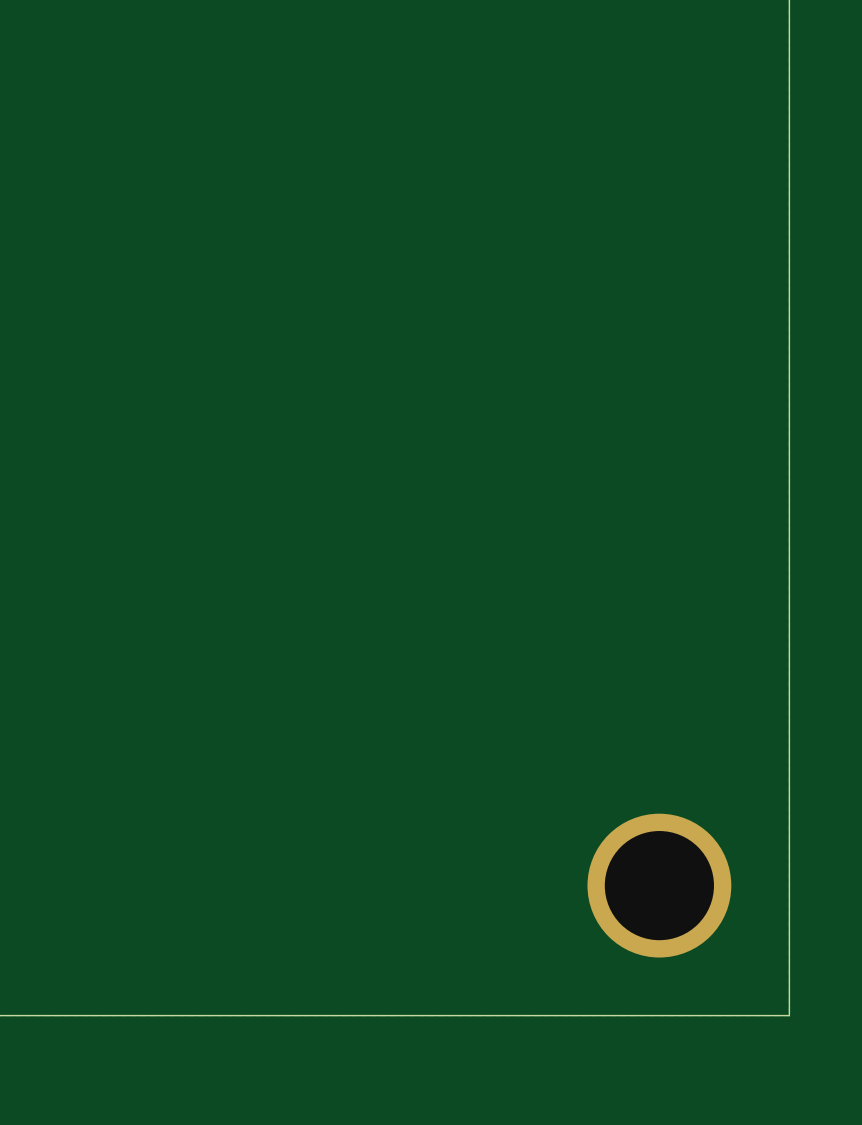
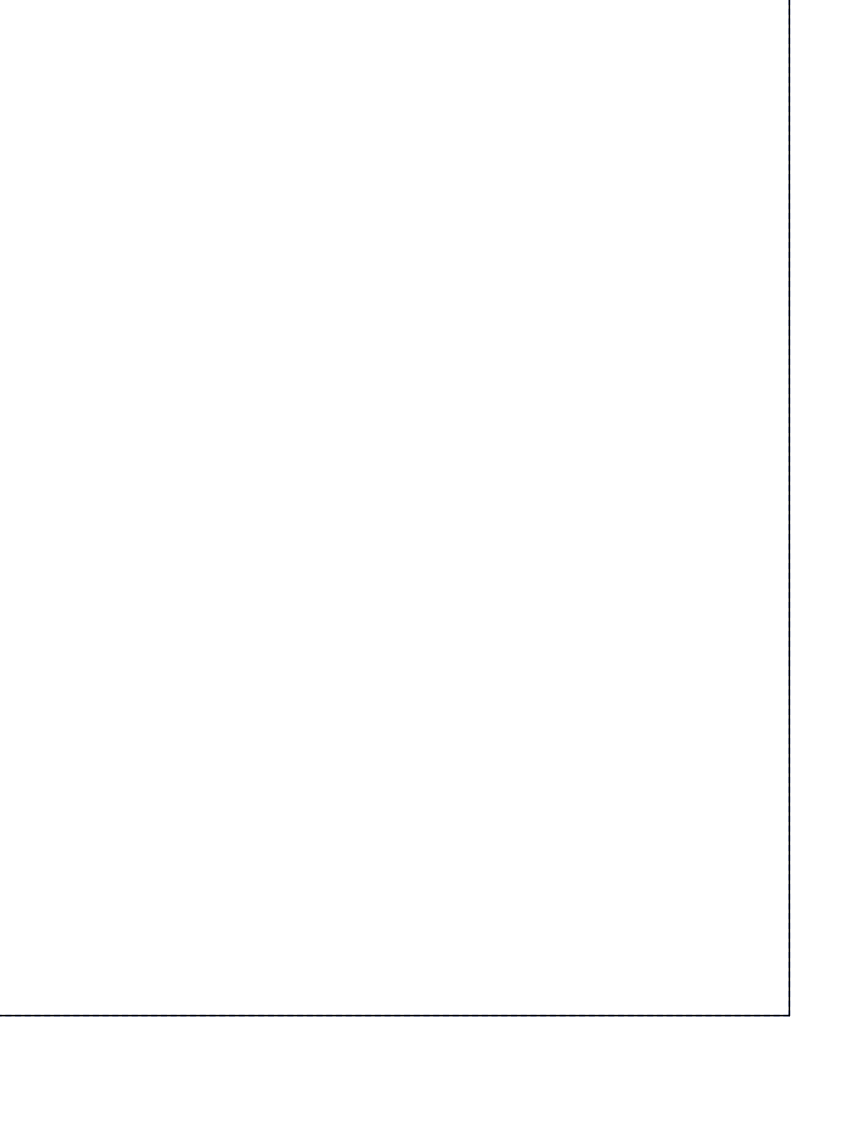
via: (659, 885) -> none

